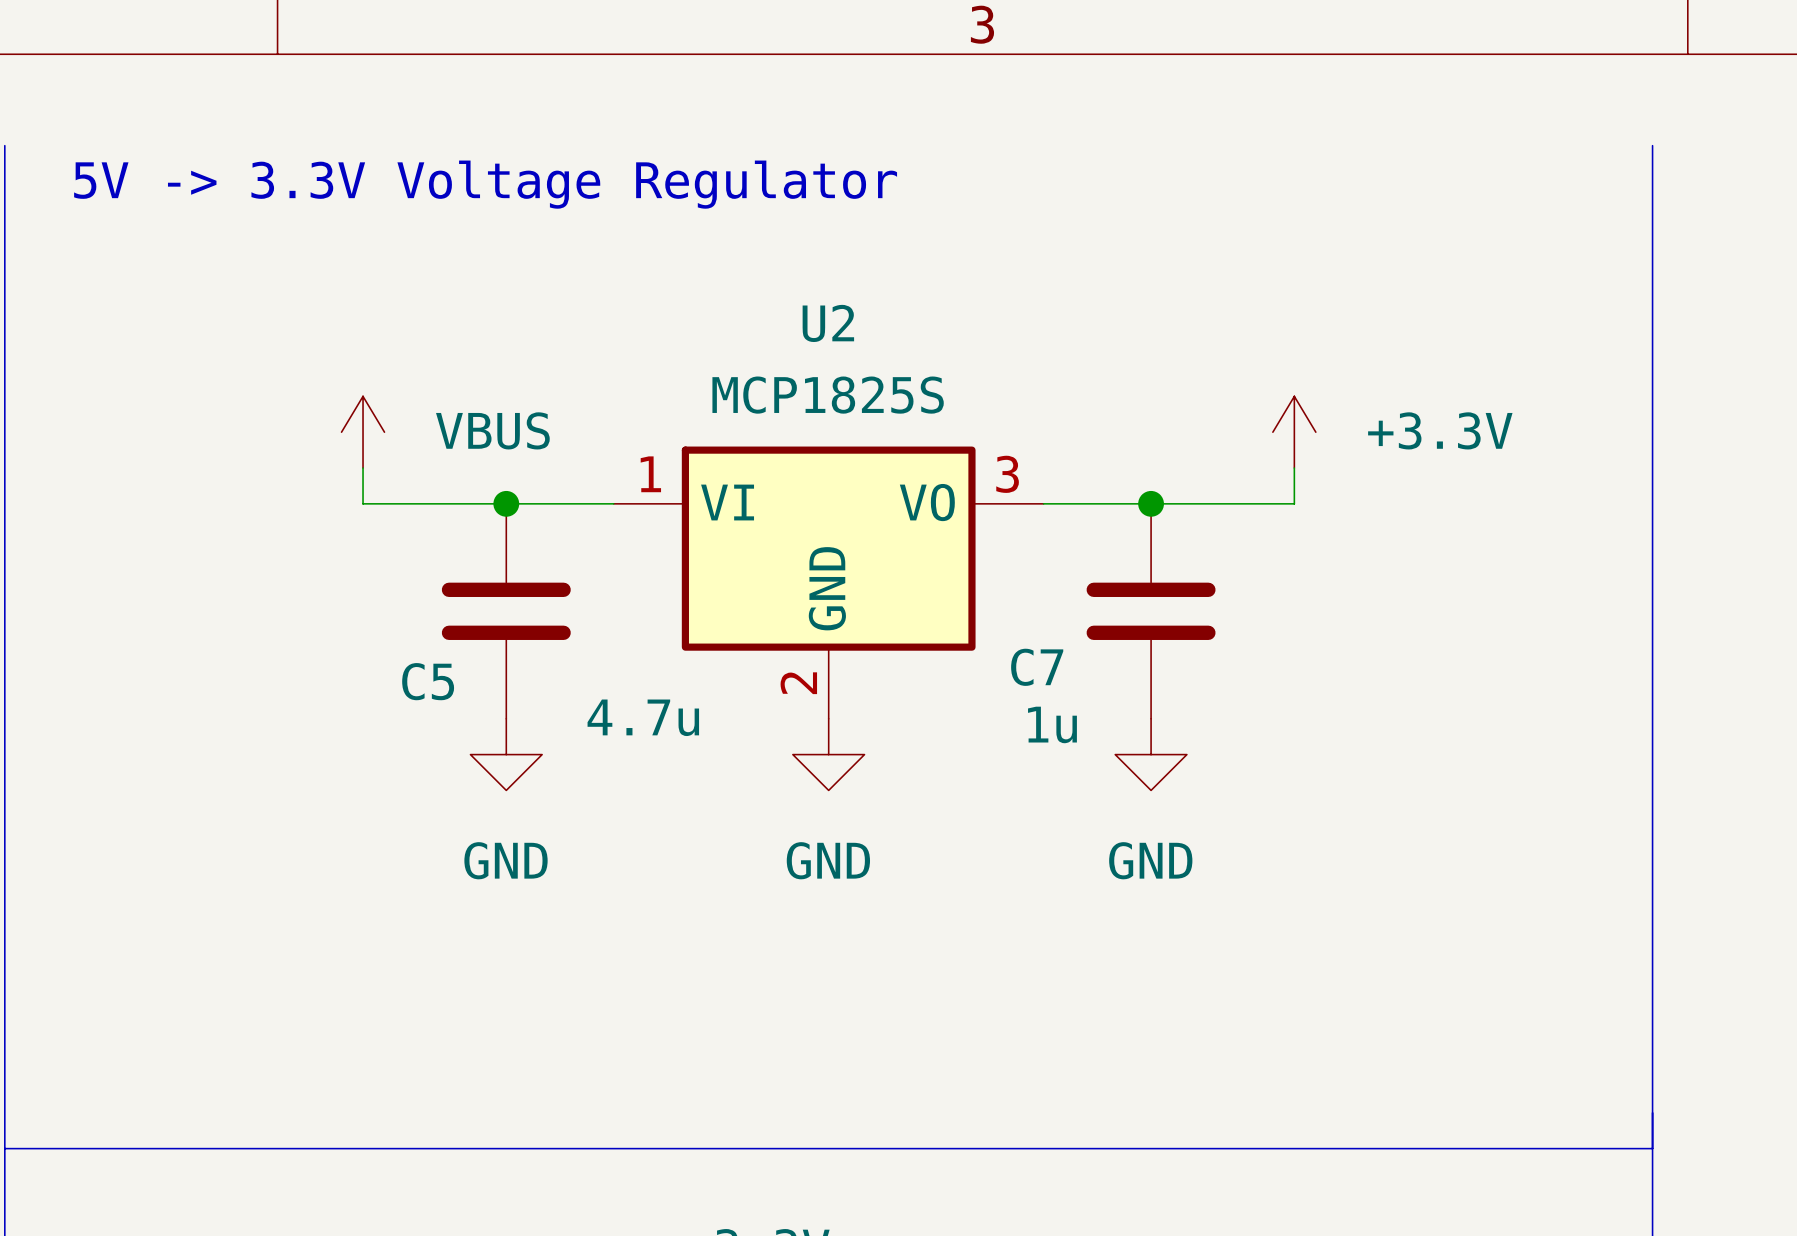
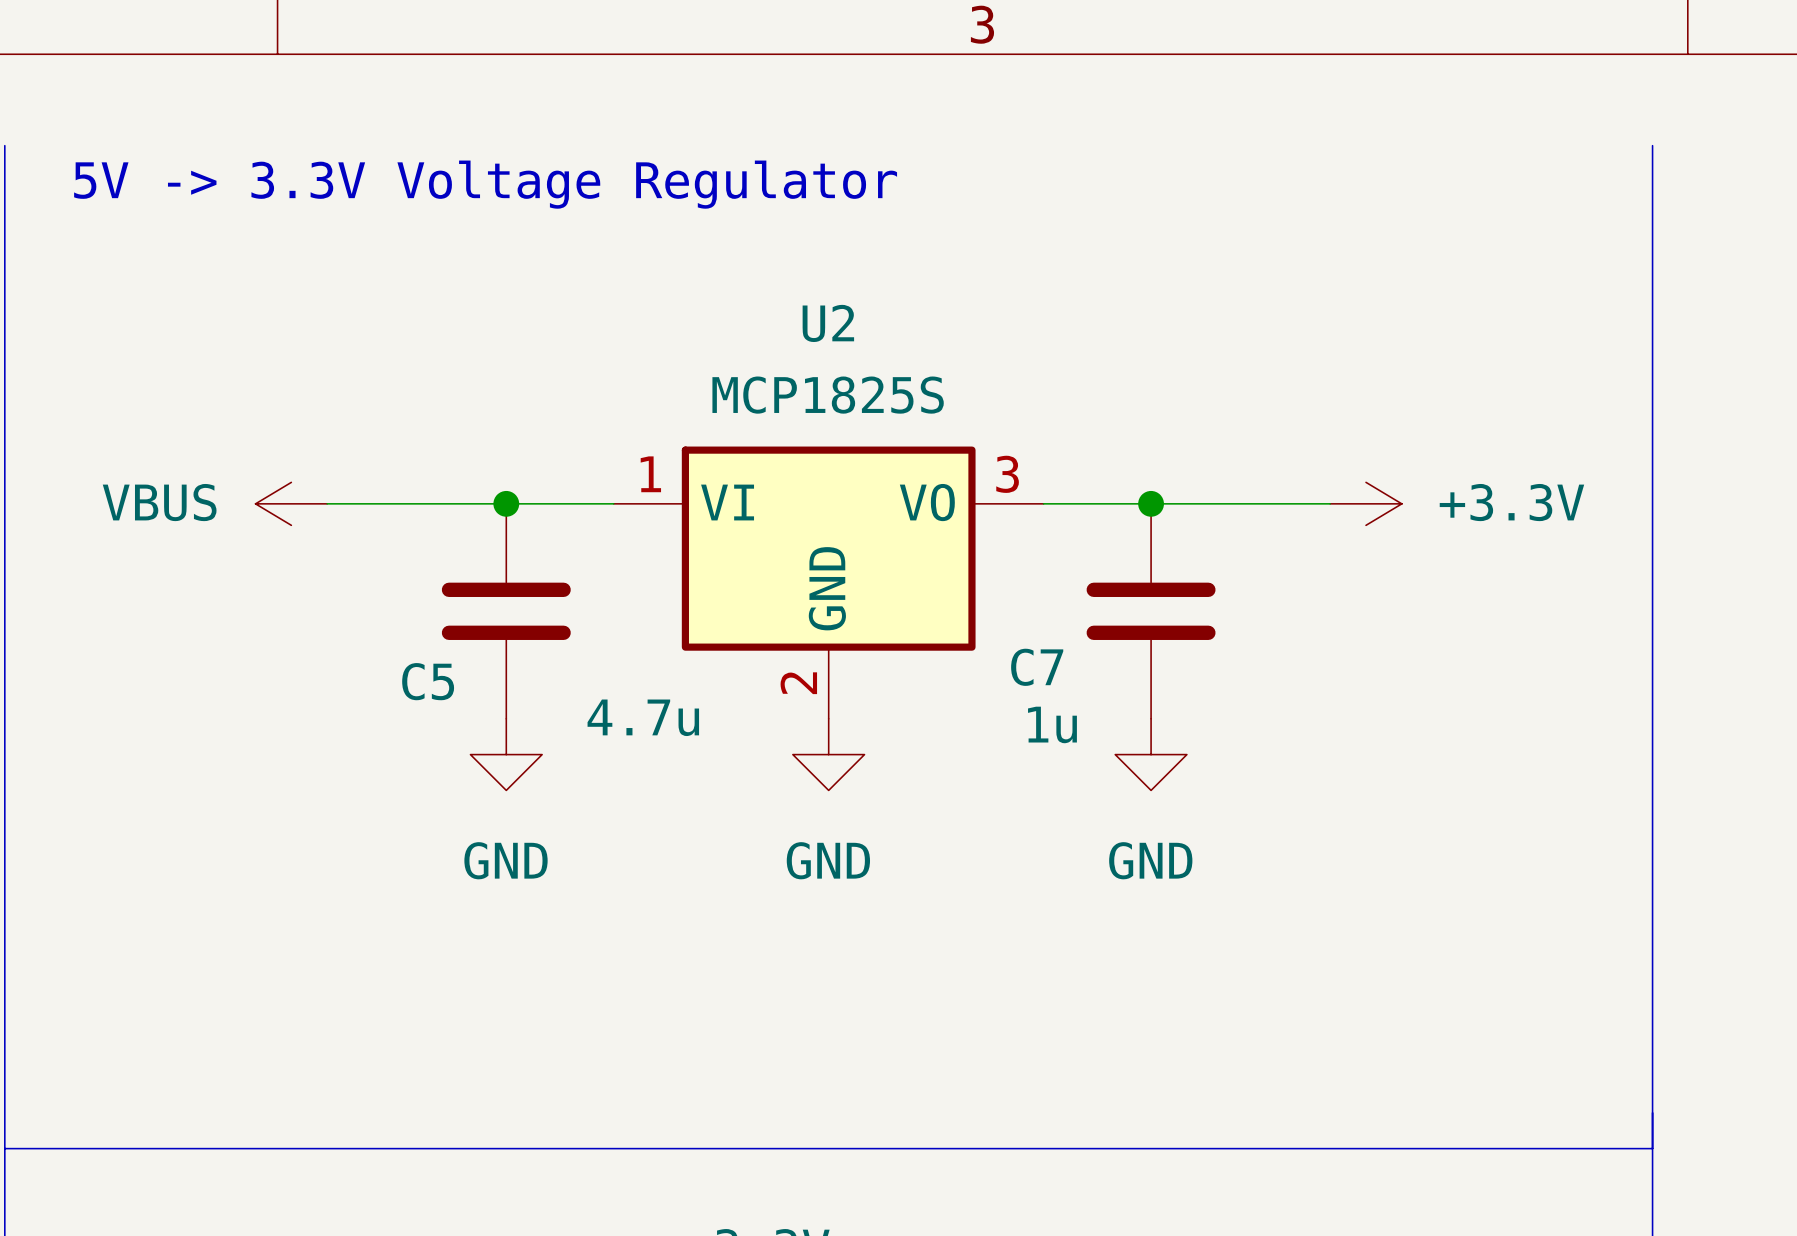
power symbol text position: VBUS (492, 430) -> VBUS (159, 502)
power symbol rotation: 0° (363, 432) -> 90° counterclockwise (291, 503)
power symbol position: VBUS (363, 432) -> VBUS (291, 503)
power symbol rotation: 0° (1294, 432) -> 90° clockwise (1365, 503)
power symbol position: +3.3V (1294, 432) -> +3.3V (1365, 503)
wire: (363, 468) (363, 503) -> (327, 503) (363, 503)
wire: (1294, 468) (1294, 503) -> (1330, 503) (1294, 503)

